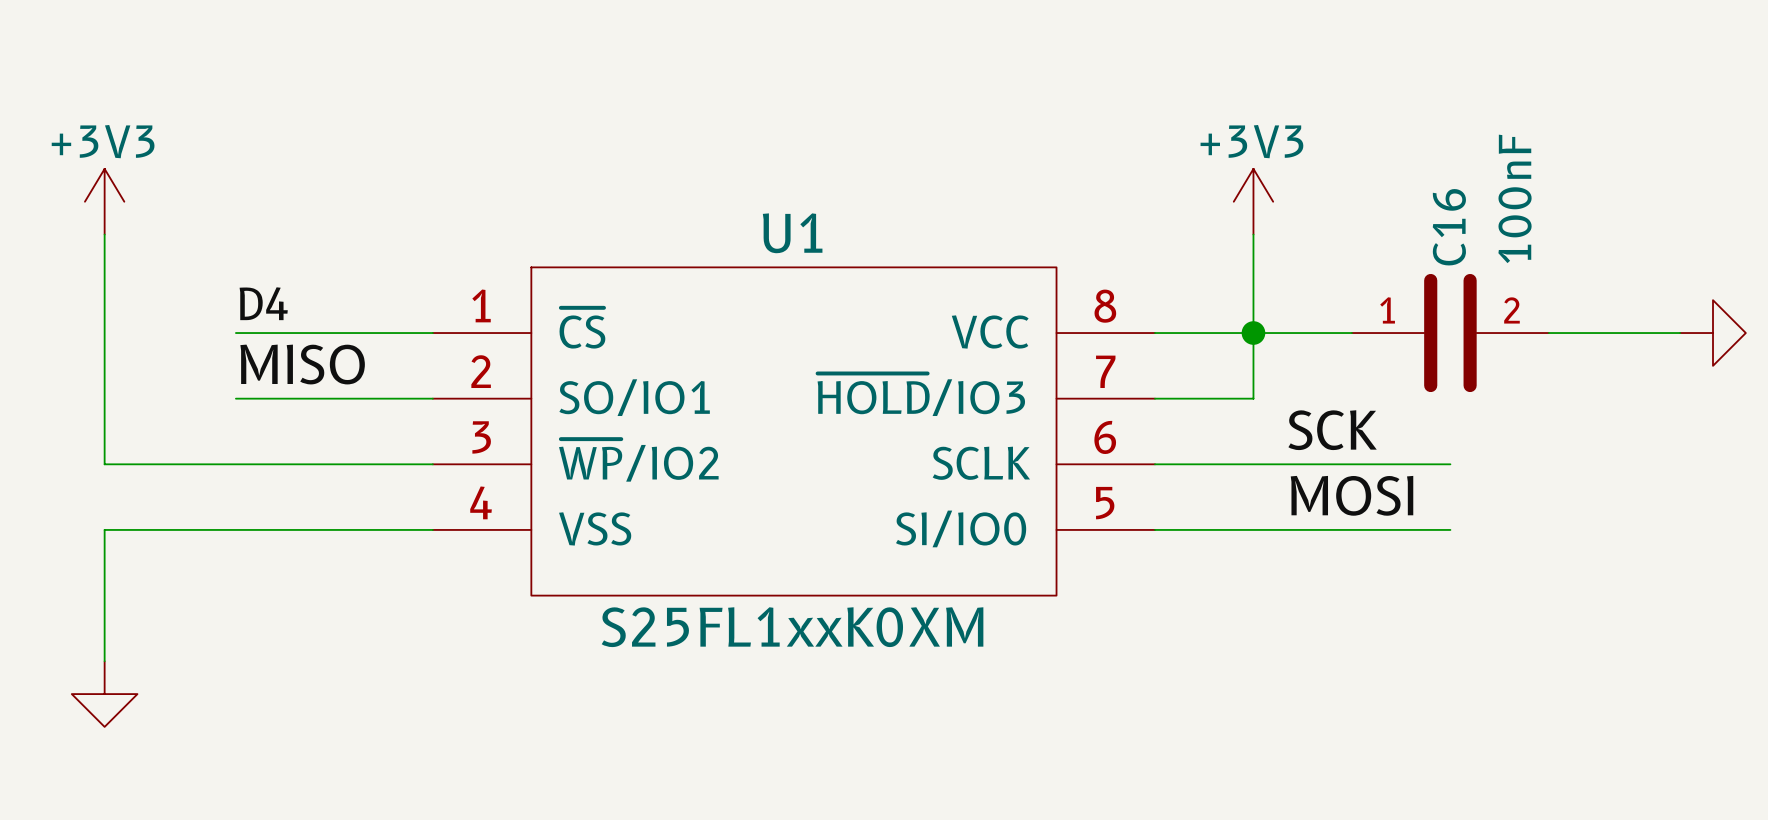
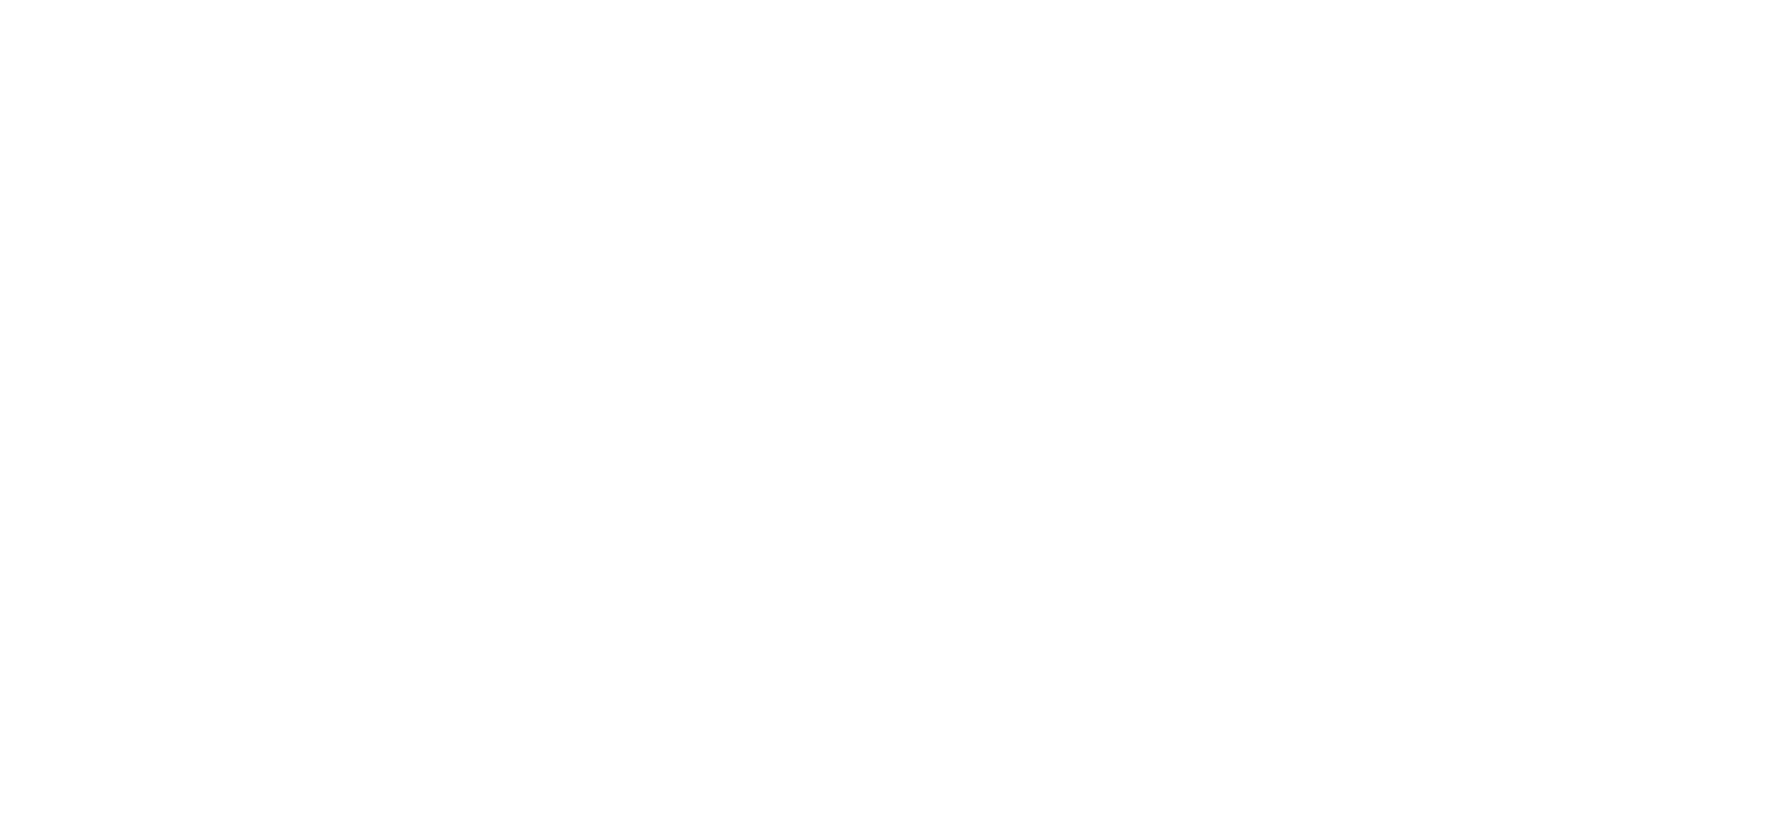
power symbol: +3V3 (104, 201) -> none
power symbol: +3V3 (1253, 201) -> none
wire: (104, 234) (104, 464) (432, 464) -> none
wire: (1253, 234) (1253, 398) (1154, 398) -> none
label: D4 (263, 303) -> none
wire: (235, 333) (432, 333) -> none
wire: (1154, 333) (1351, 333) -> none
junction: (1253, 333) -> none
C16: 100nF (1450, 333) -> none
wire: (1548, 333) (1680, 333) -> none
power symbol: (1713, 333) -> none
label: MISO (302, 364) -> none
wire: (235, 398) (432, 398) -> none
label: SCK (1332, 430) -> none
U1: S25FL1xxK0XM (793, 431) -> none
wire: (1154, 464) (1450, 464) -> none
label: MOSI (1352, 495) -> none
wire: (432, 529) (104, 529) (104, 661) -> none
wire: (1154, 529) (1450, 529) -> none
power symbol: (104, 694) -> none

